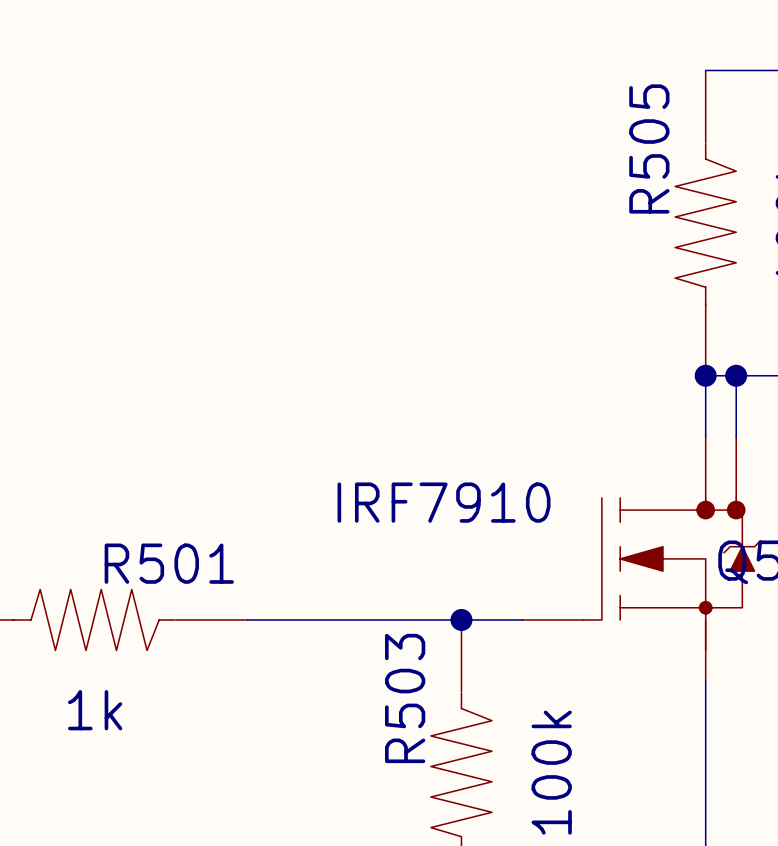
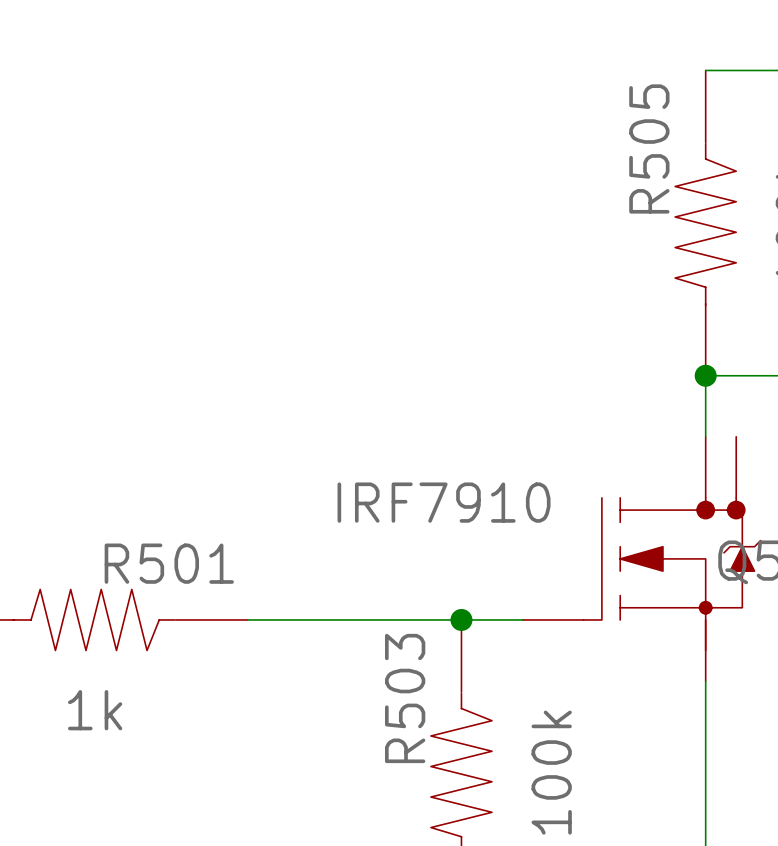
wire: (736, 375) (736, 436) -> none
junction: (736, 375) -> none

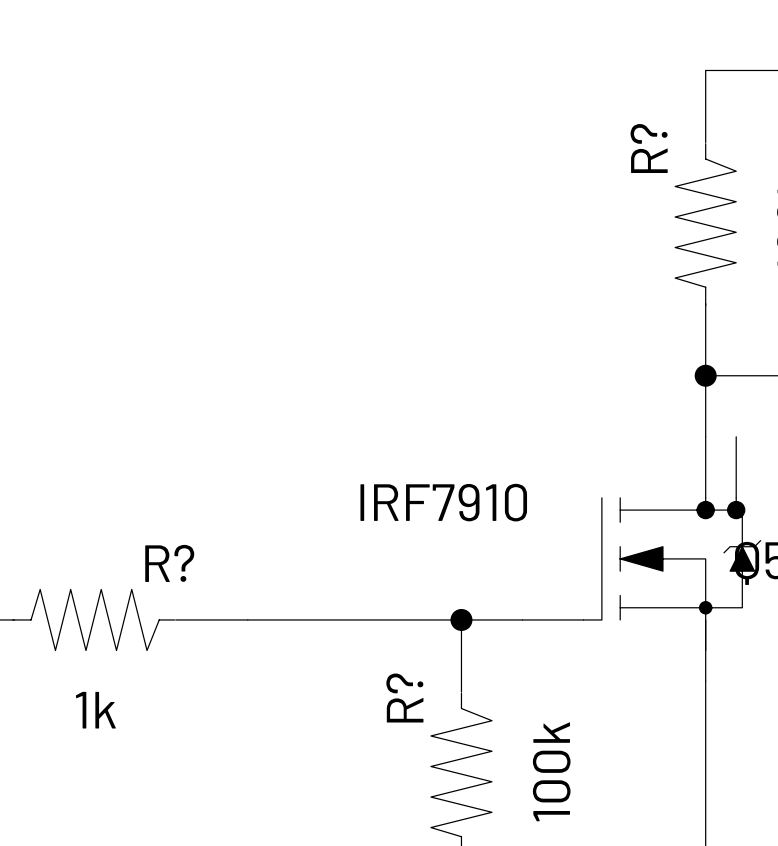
R505 name: R505 (649, 148) -> R? (649, 148)
R501 name: R501 (169, 563) -> R? (169, 563)
R503 name: R503 (405, 698) -> R? (404, 698)

